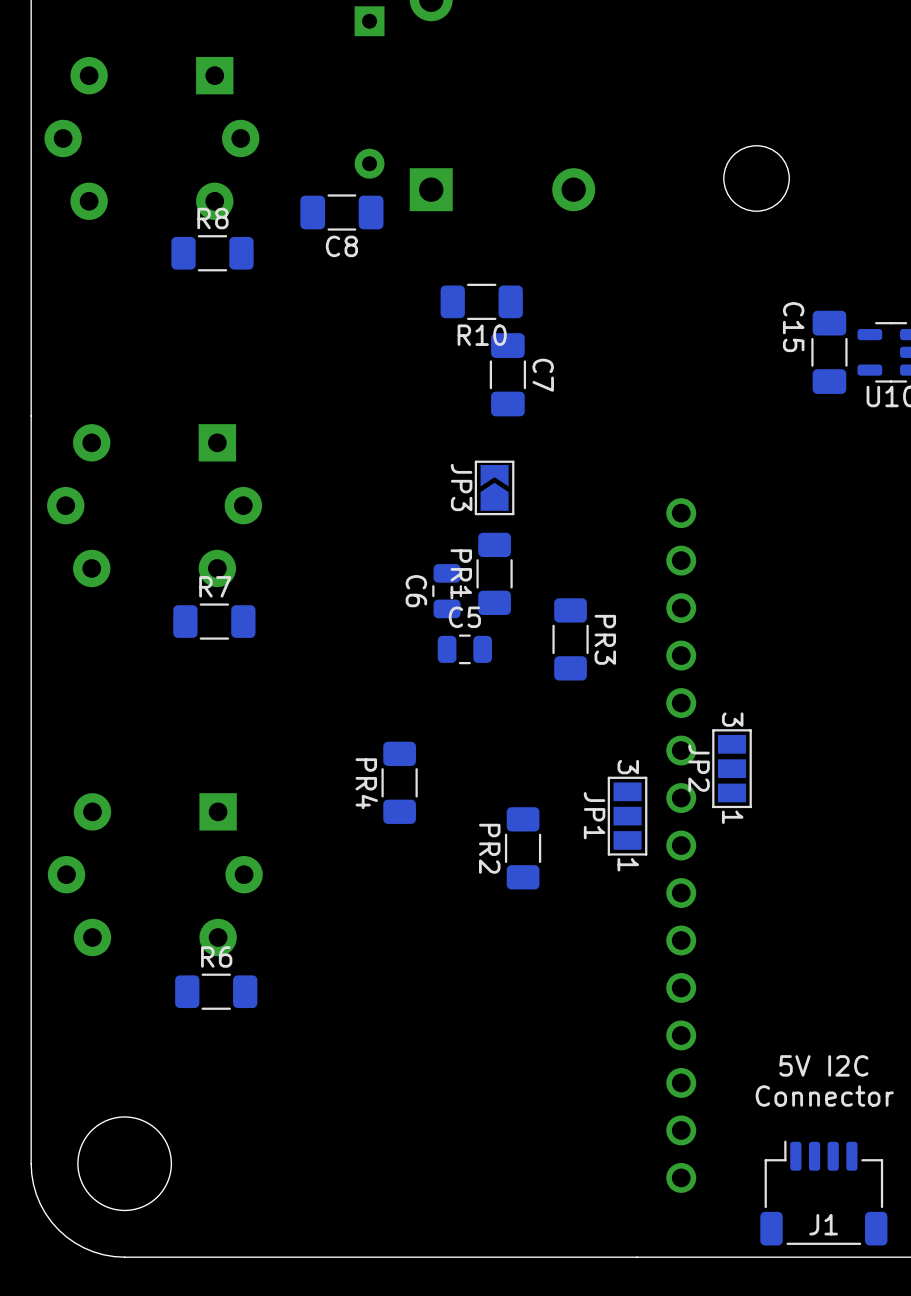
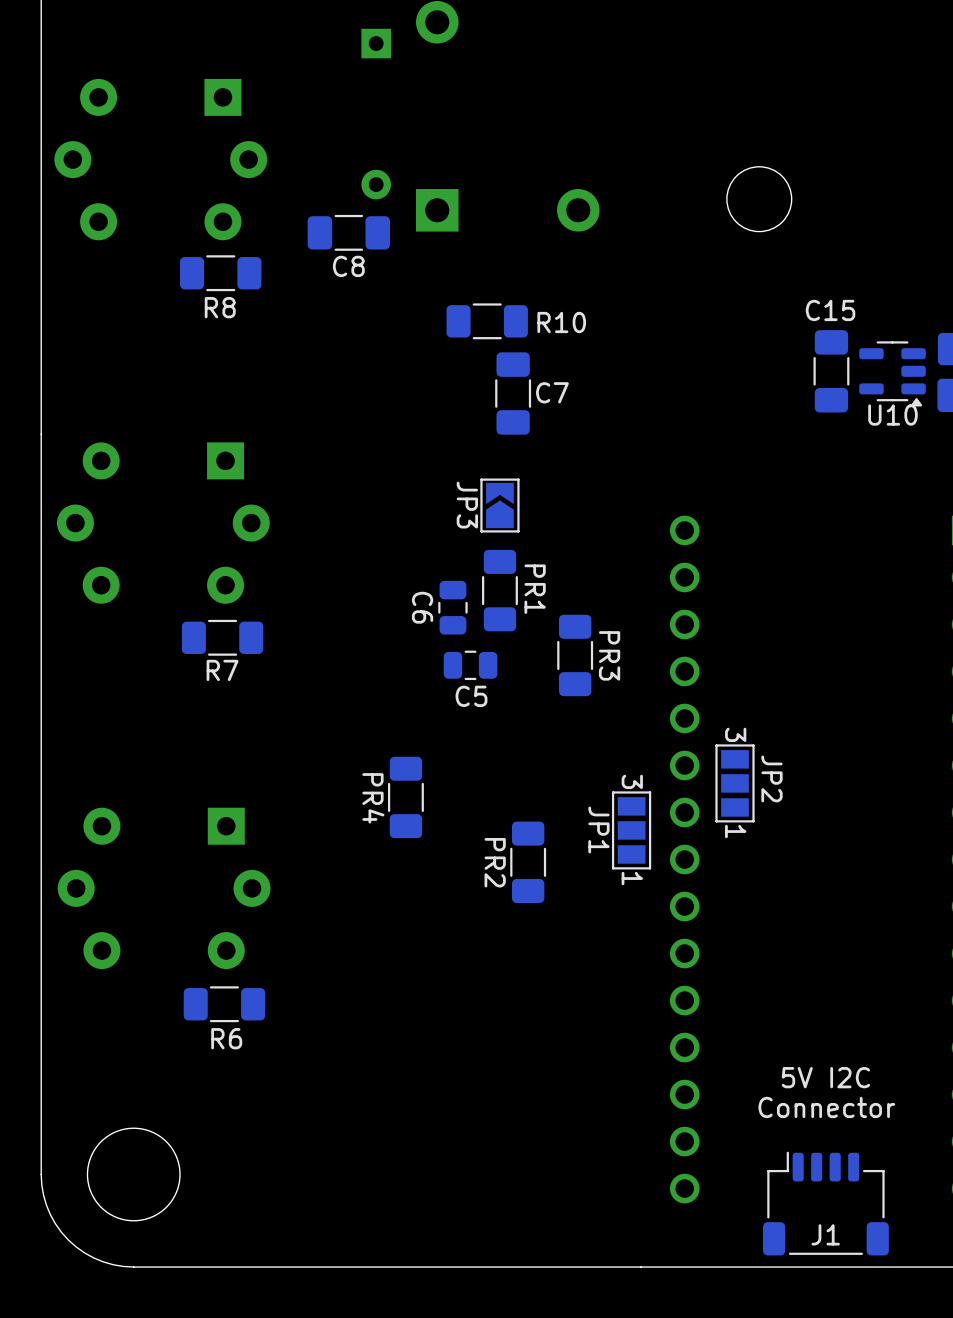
R8 name position: R8 (212, 218) -> R8 (220, 307)
C15 name rotation: 0° (793, 327) -> 90° counterclockwise (830, 310)
R10 name position: R10 (482, 335) -> R10 (561, 322)
C7 name rotation: 0° (543, 375) -> 90° counterclockwise (552, 392)
PR1 name position: PR1 (461, 574) -> PR1 (535, 589)
R7 name position: R7 (215, 586) -> R7 (222, 670)
C5 name position: C5 (464, 617) -> C5 (471, 696)
JP2 name position: JP2 (699, 768) -> JP2 (772, 778)
R6 name position: R6 (216, 956) -> R6 (226, 1038)

